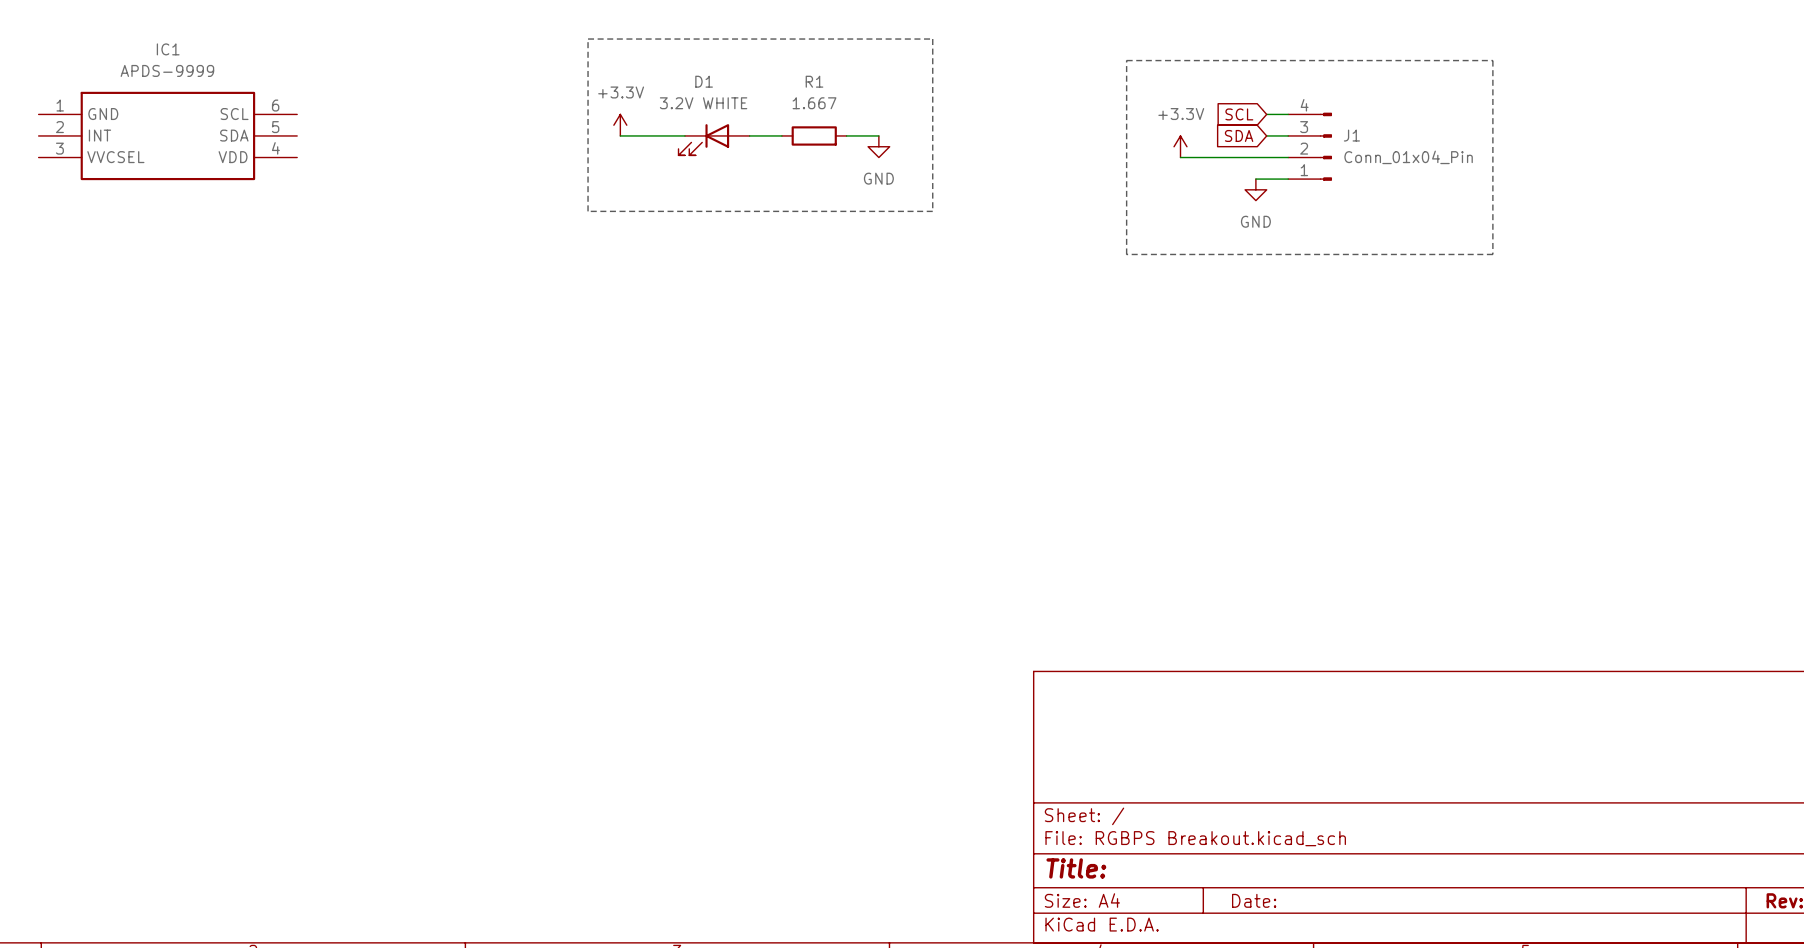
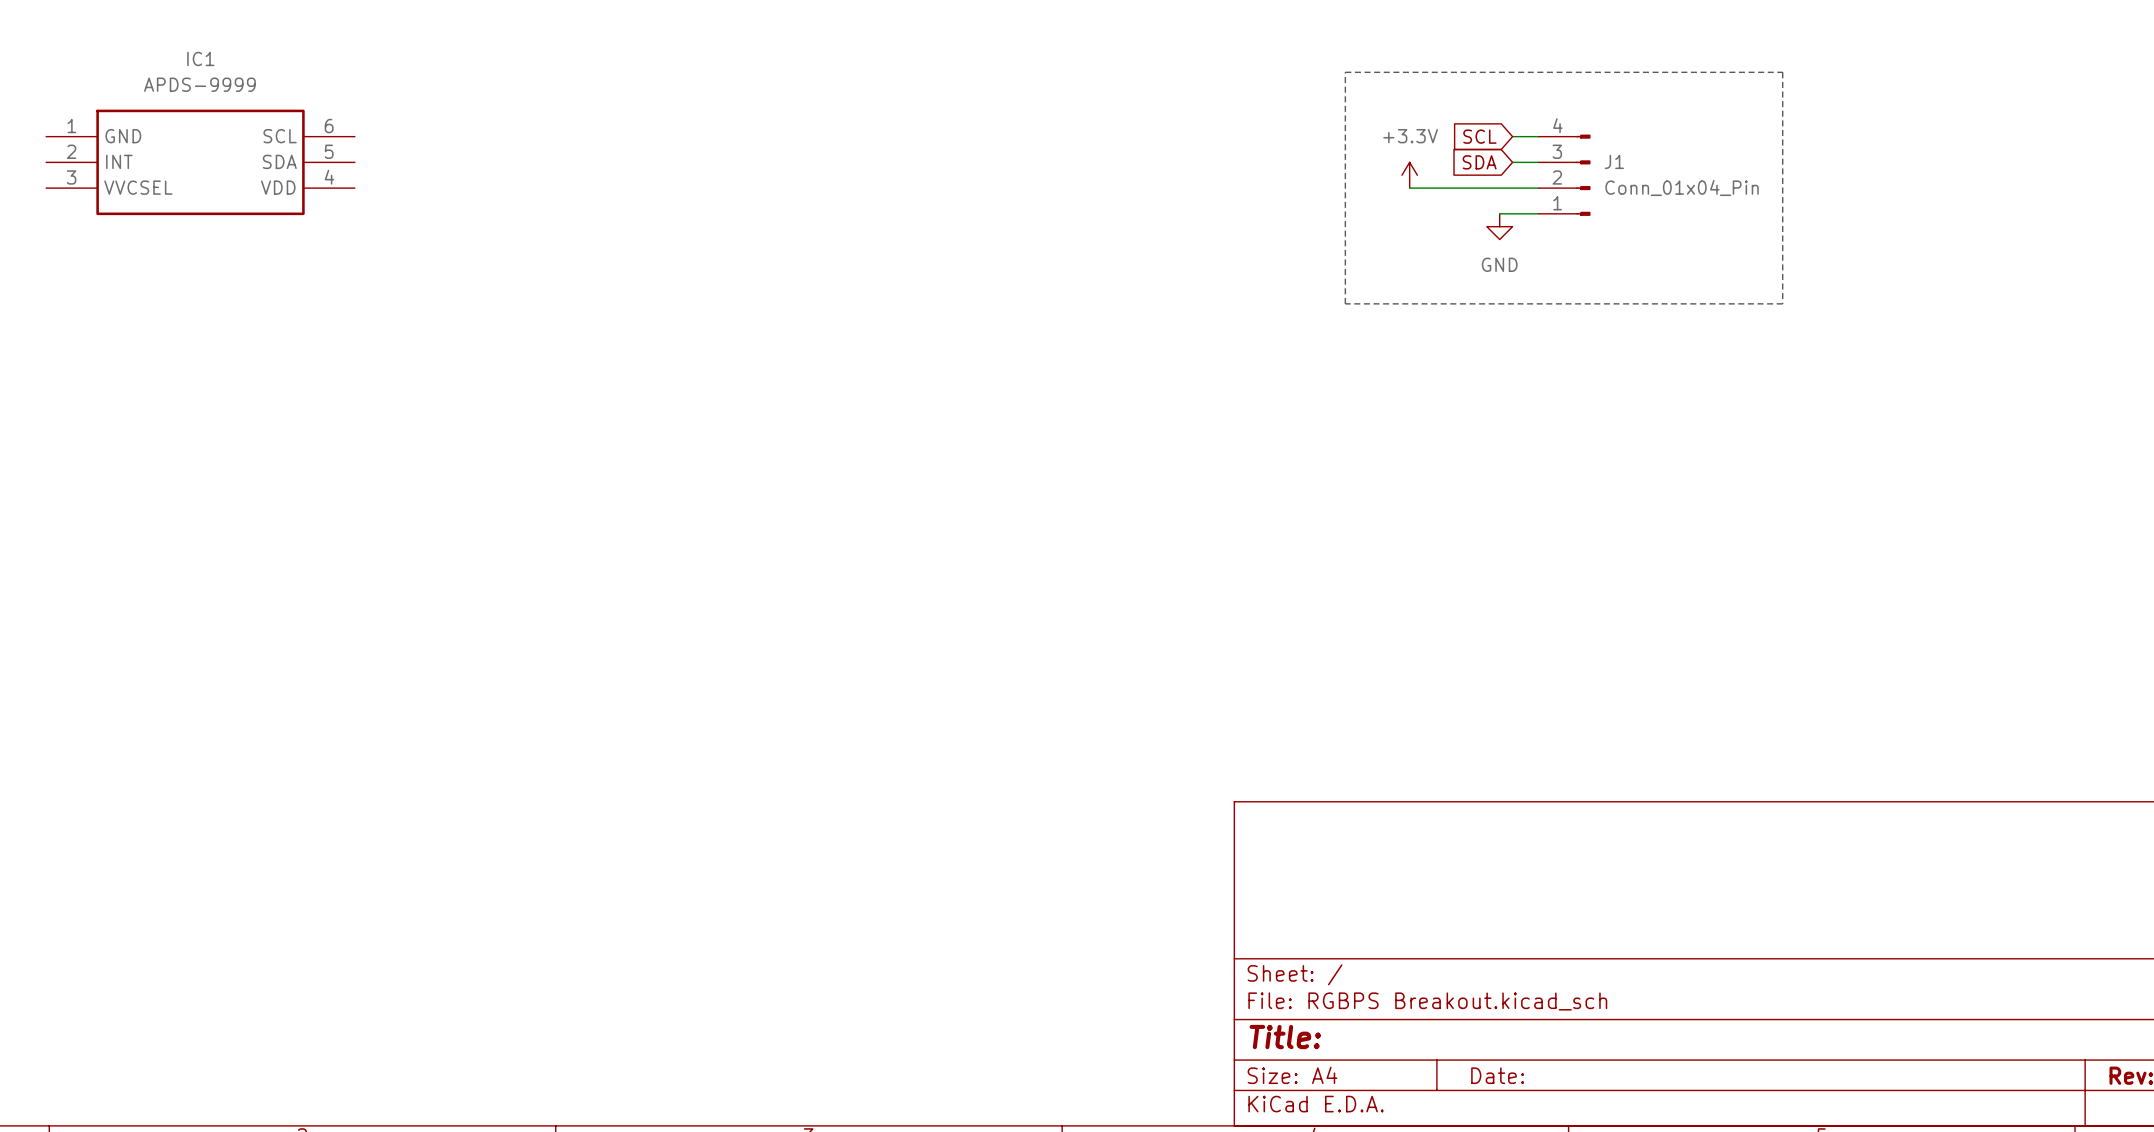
line: (588, 39) (932, 39) (932, 211) (588, 211) (588, 39) -> none
power symbol: +3.3V (620, 125) -> none
wire: (620, 135) (684, 135) -> none
wire: (749, 135) (781, 135) -> none
R1: 1.667 (814, 135) -> none
wire: (846, 135) (878, 135) -> none
D1: 3.2V WHITE (714, 139) -> none
power symbol: GND (878, 146) -> none

